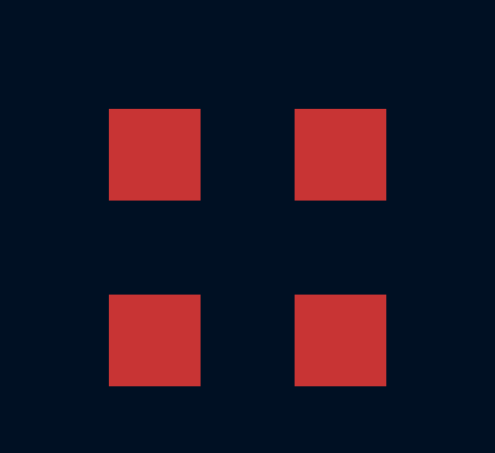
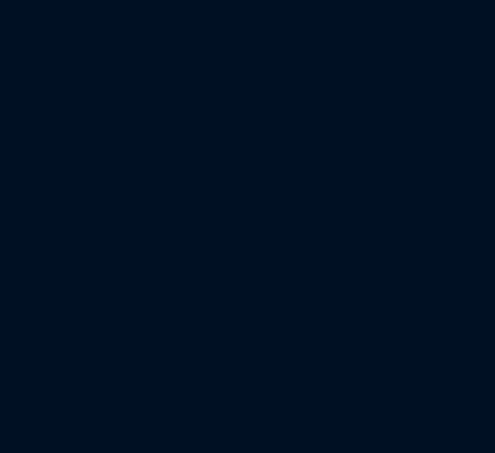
part: (154, 154) -> none
part: (340, 154) -> none
part: (154, 340) -> none
part: (340, 340) -> none

